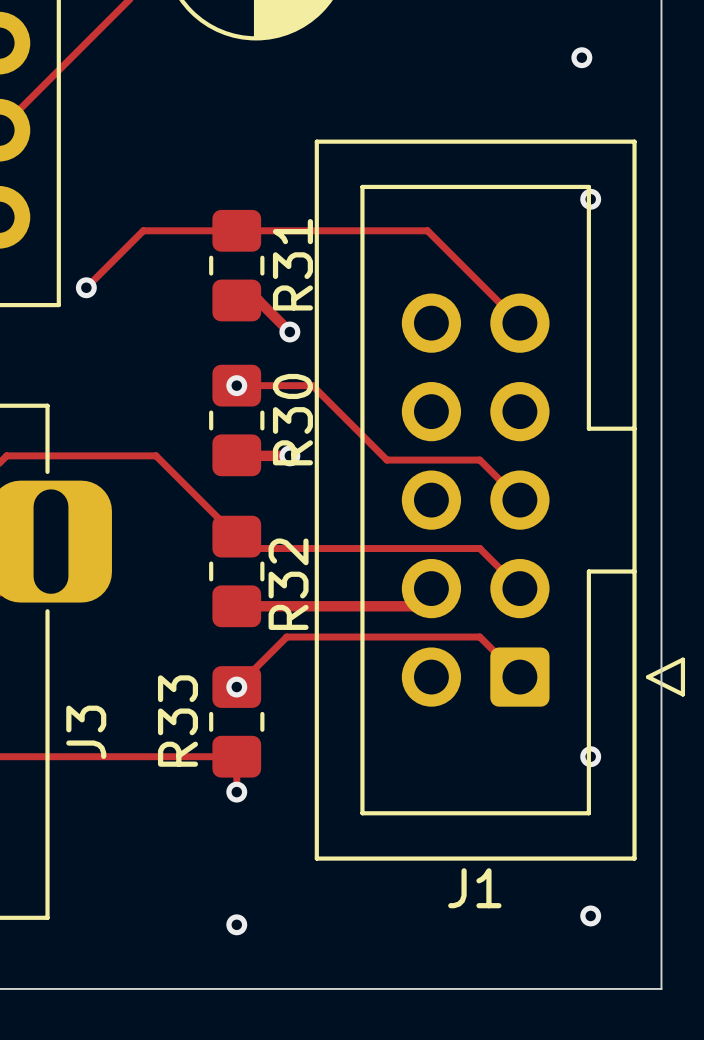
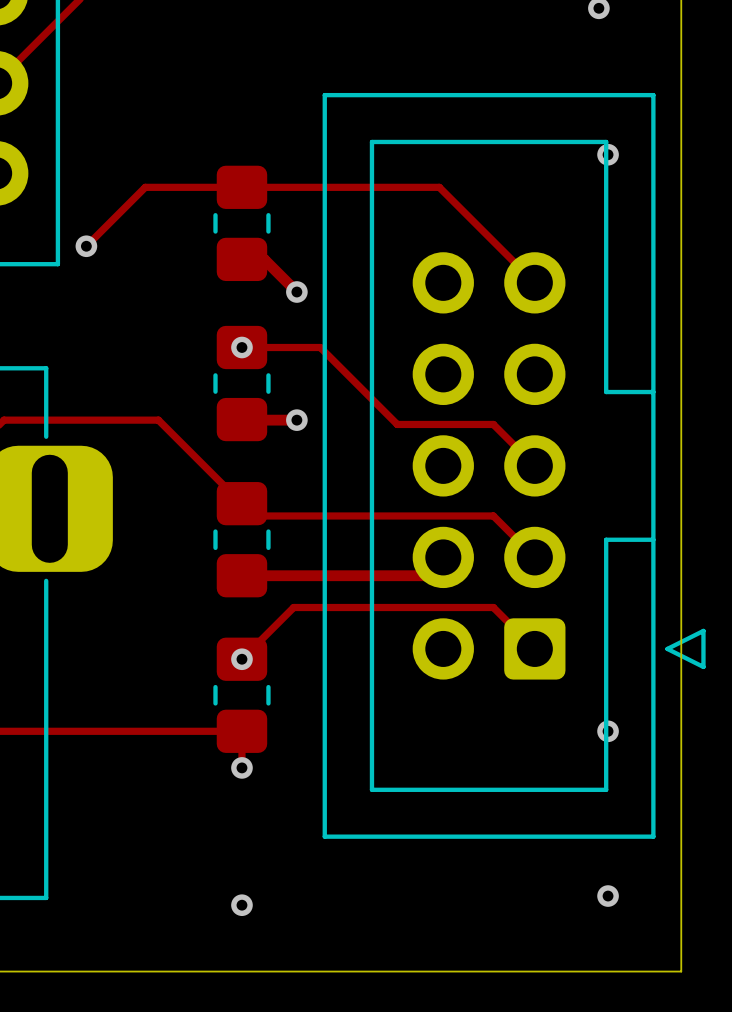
R31 name: R31 (292, 264) -> none
R30 name: R30 (292, 419) -> none
R32 name: R32 (288, 584) -> none
R33 name: R33 (177, 721) -> none
J3 name: J3 (86, 732) -> none
J1 name: J1 (474, 888) -> none

